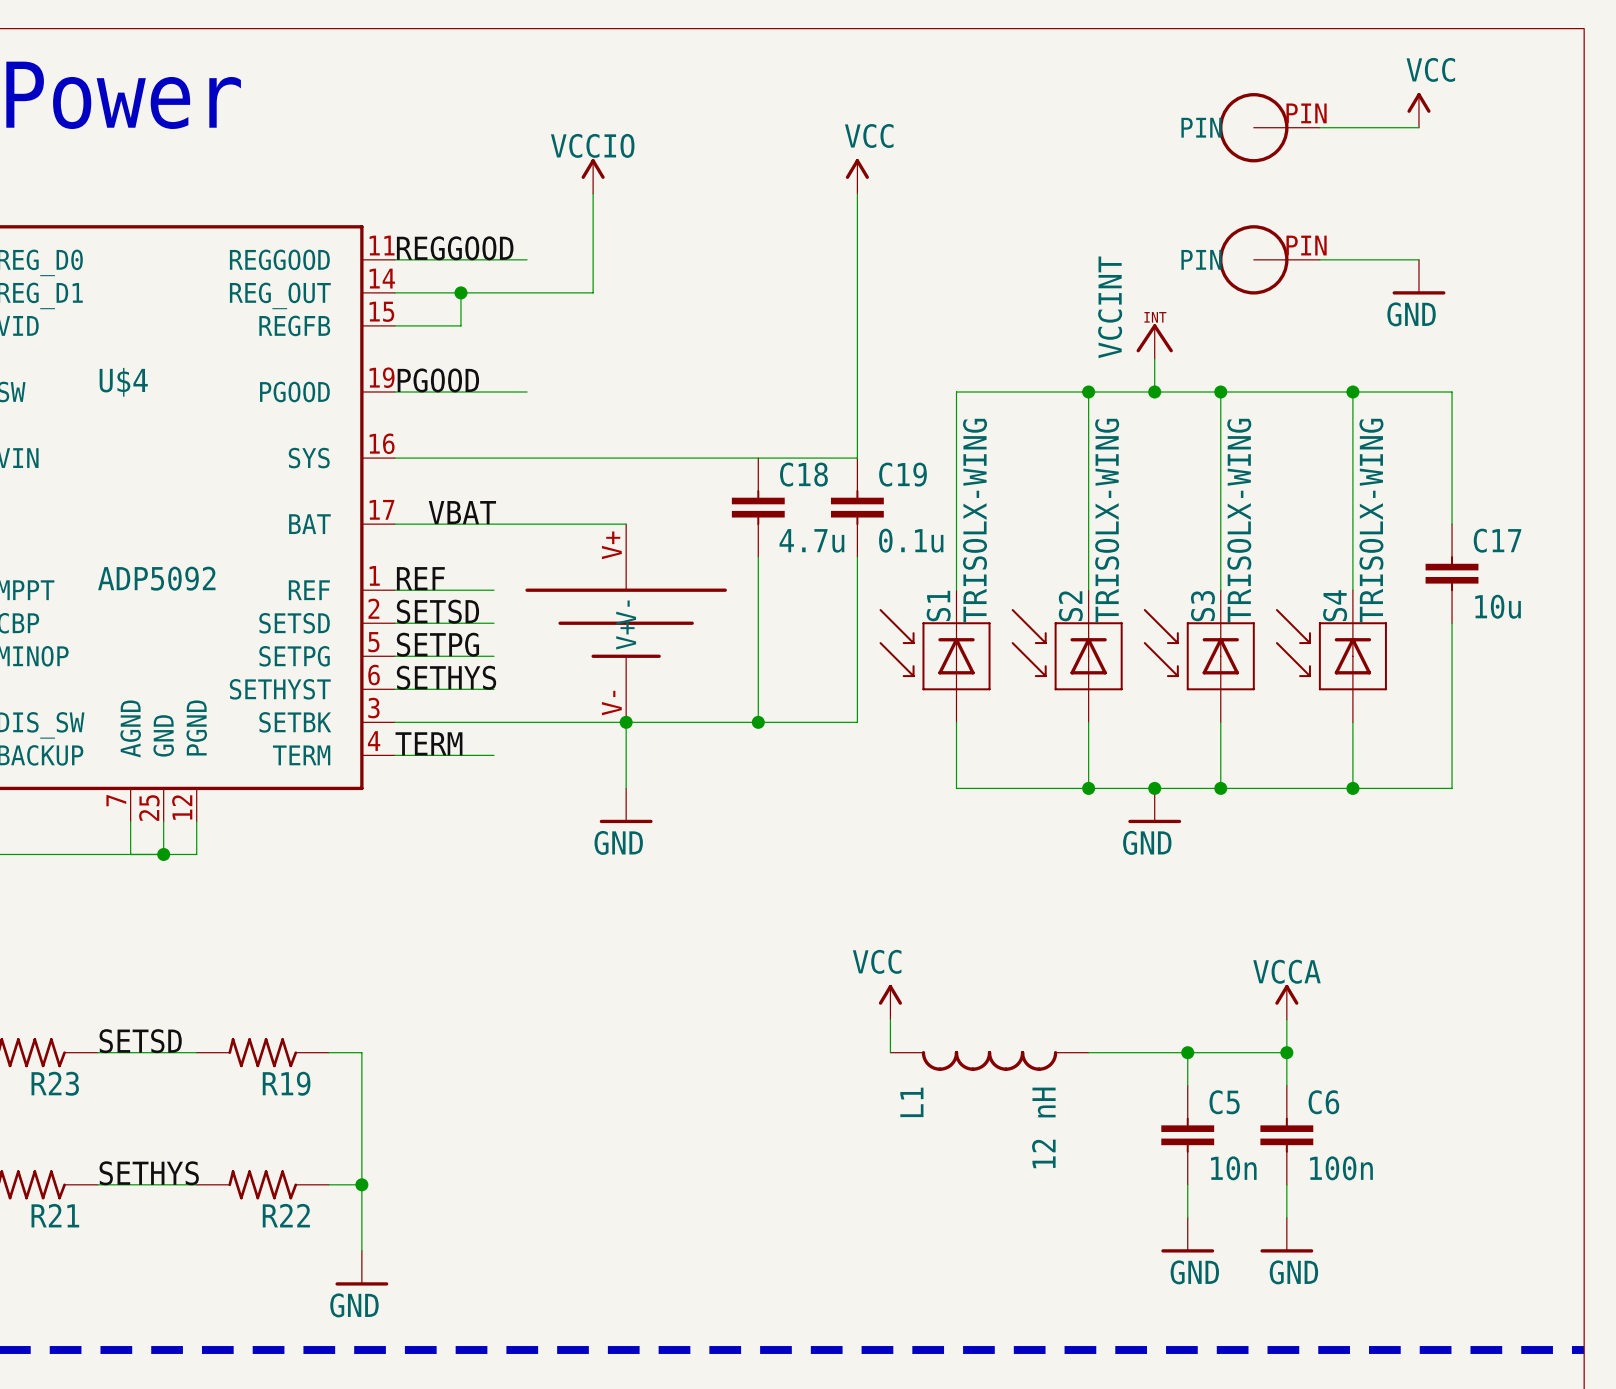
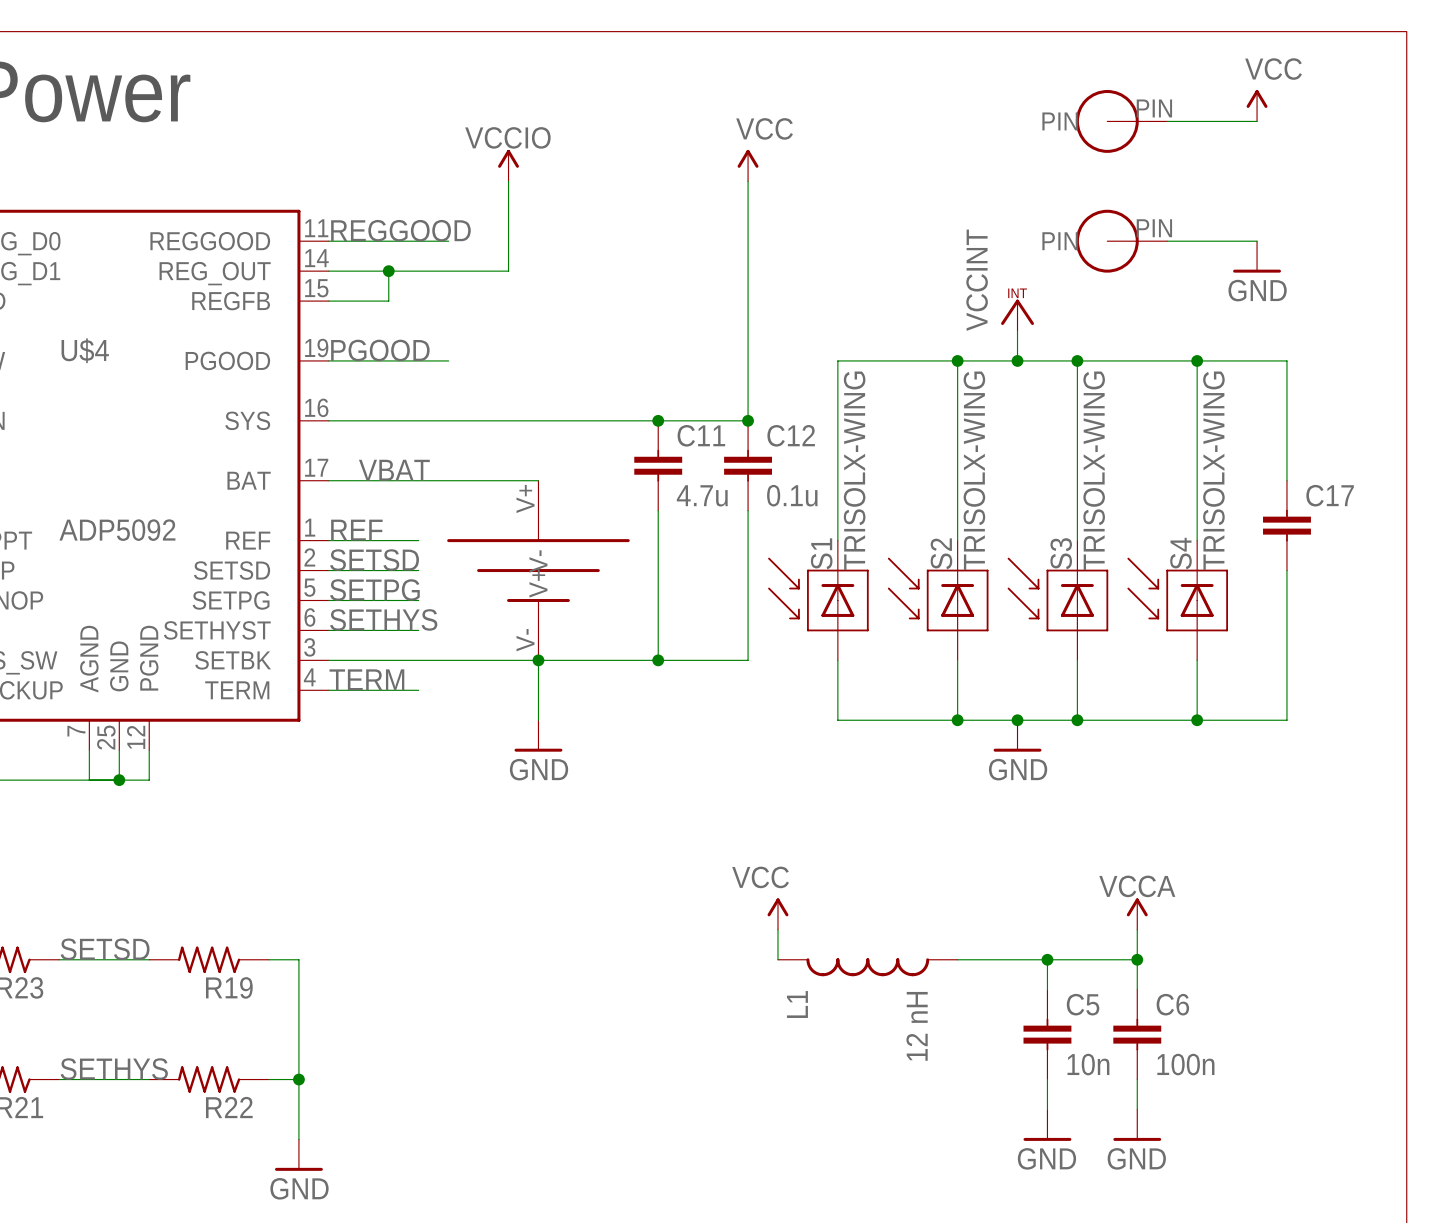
junction: none -> (658, 420)
junction: none -> (748, 420)
C18 name: C18 (803, 474) -> C11 (701, 435)
C19 name: C19 (902, 474) -> C12 (791, 435)
C17 value: 10u (1498, 606) -> none

